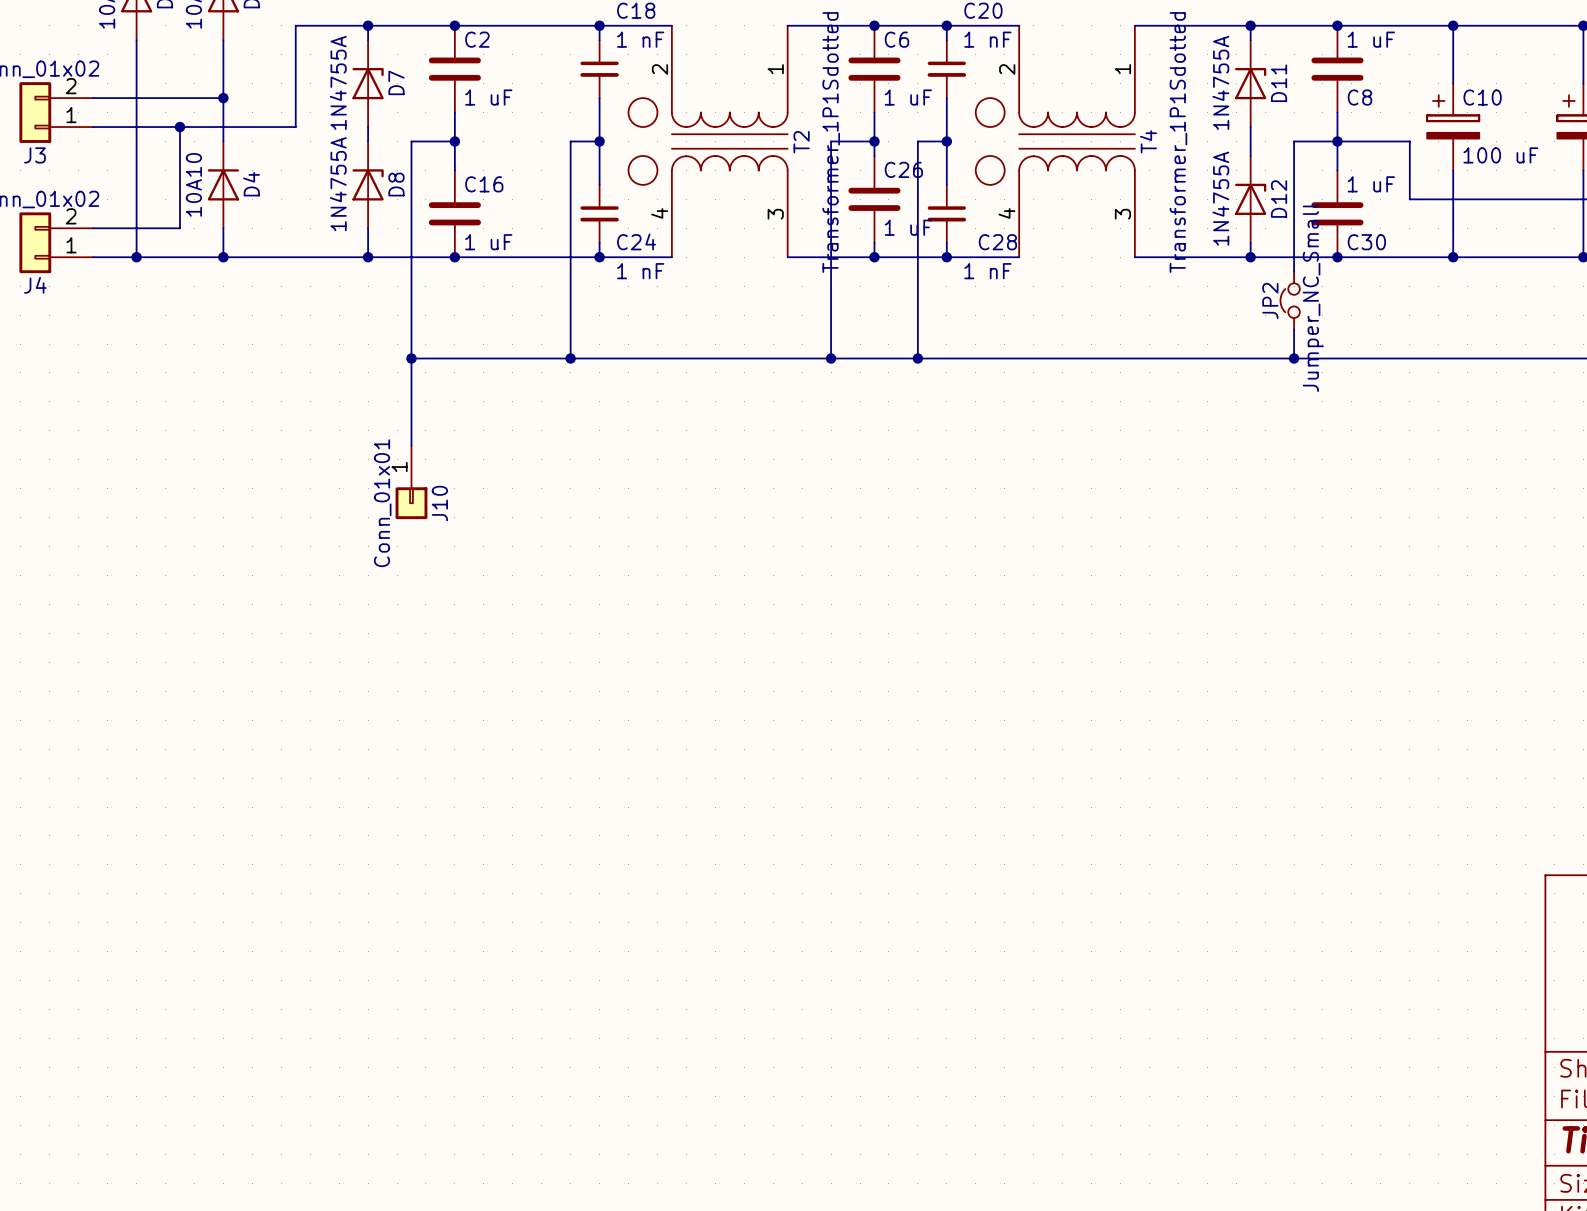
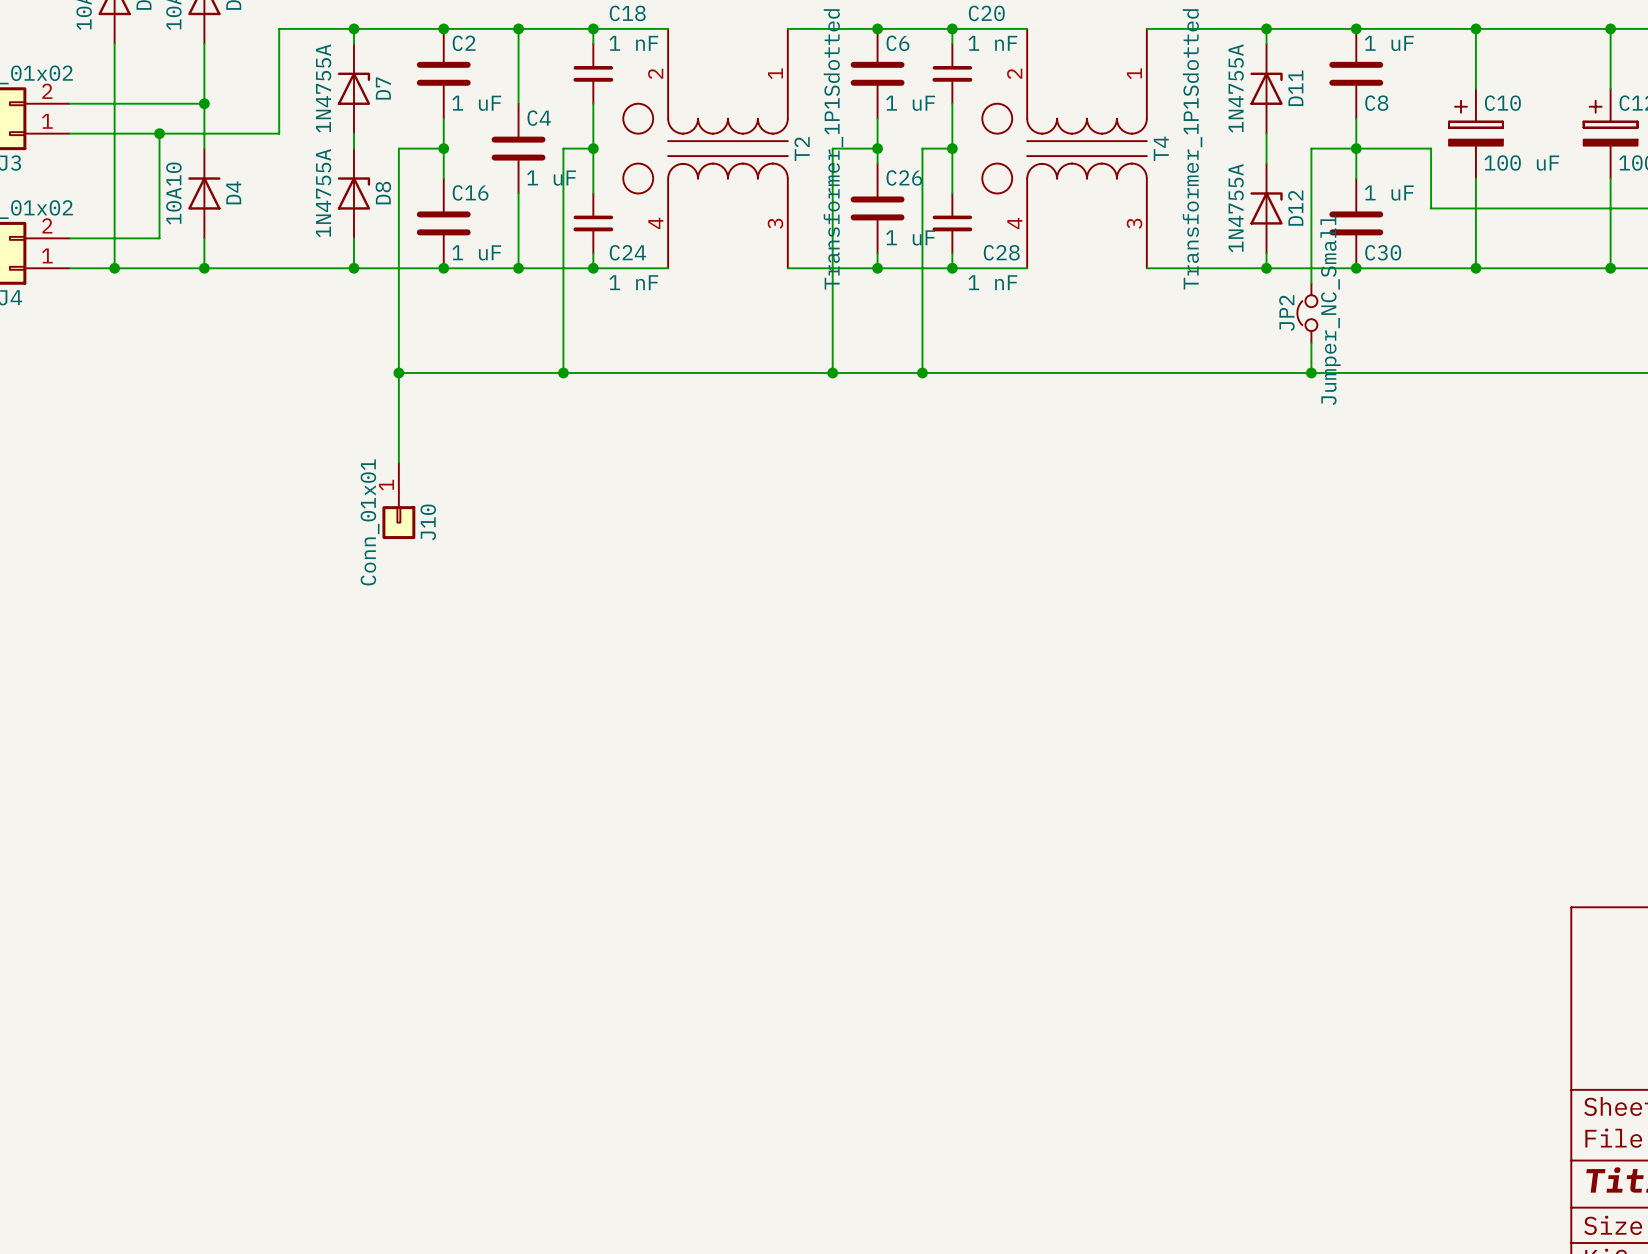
wire: none -> (518, 28) (518, 103)
junction: none -> (518, 28)
C4: none -> 1 uF (518, 148)
wire: none -> (518, 193) (518, 268)
junction: none -> (518, 268)

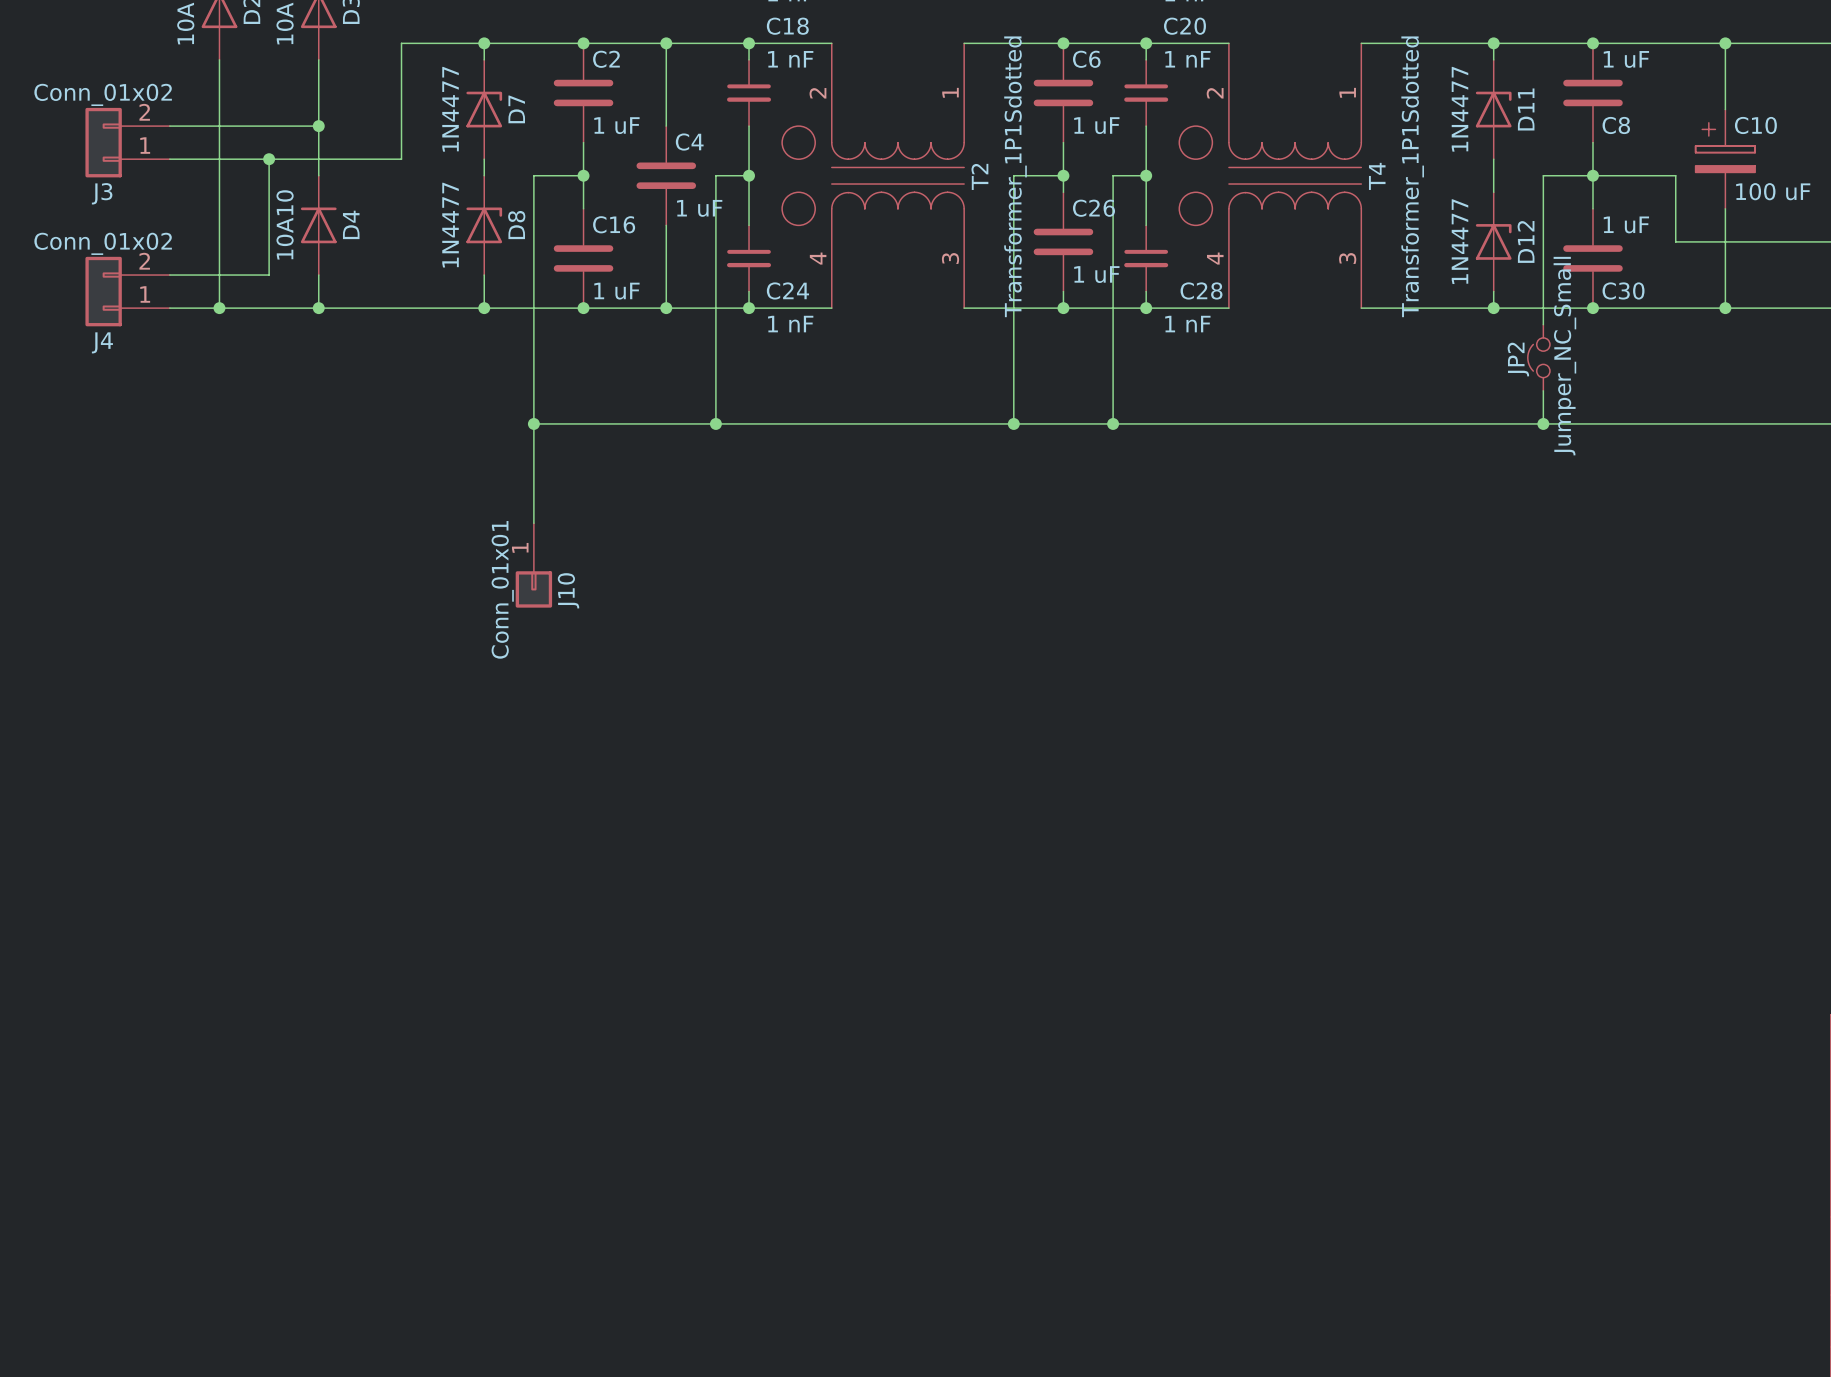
D7 value: 1N4755A (323, 88) -> 1N4477 (450, 109)
D11 value: 1N4755A (1236, 88) -> 1N4477 (1459, 109)
D8 value: 1N4755A (323, 193) -> 1N4477 (450, 225)
D12 value: 1N4755A (1236, 208) -> 1N4477 (1459, 241)

